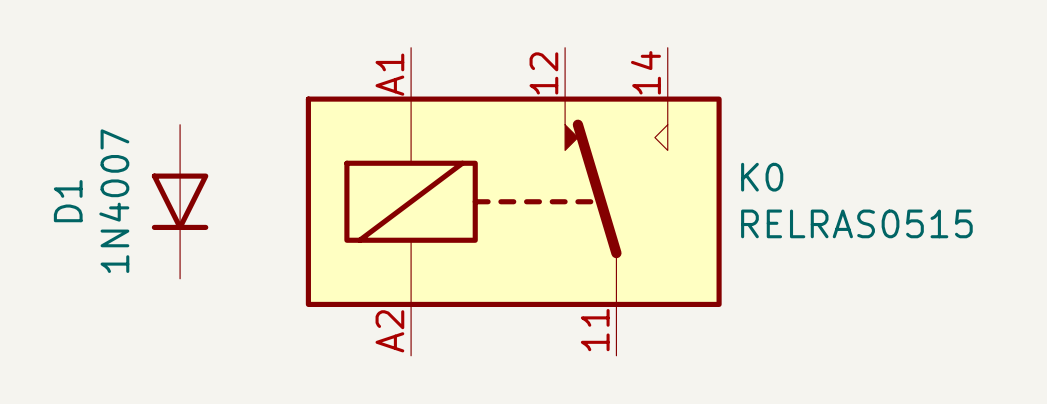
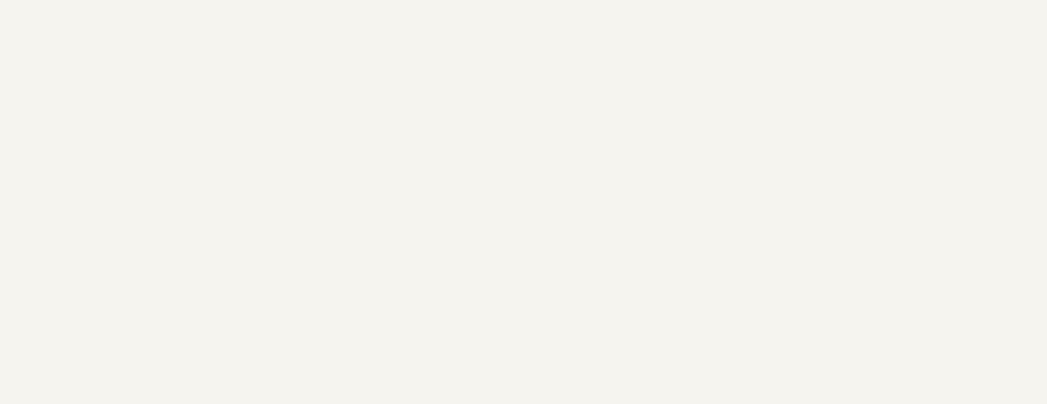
D1: 1N4007 (180, 201) -> none
K0: RELRAS0515 (513, 201) -> none

